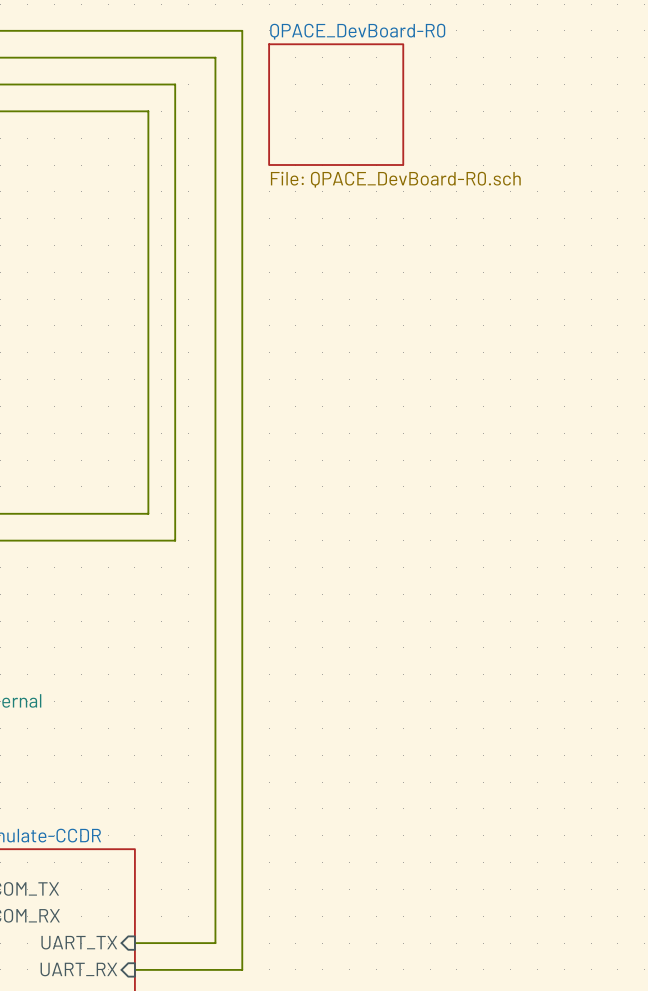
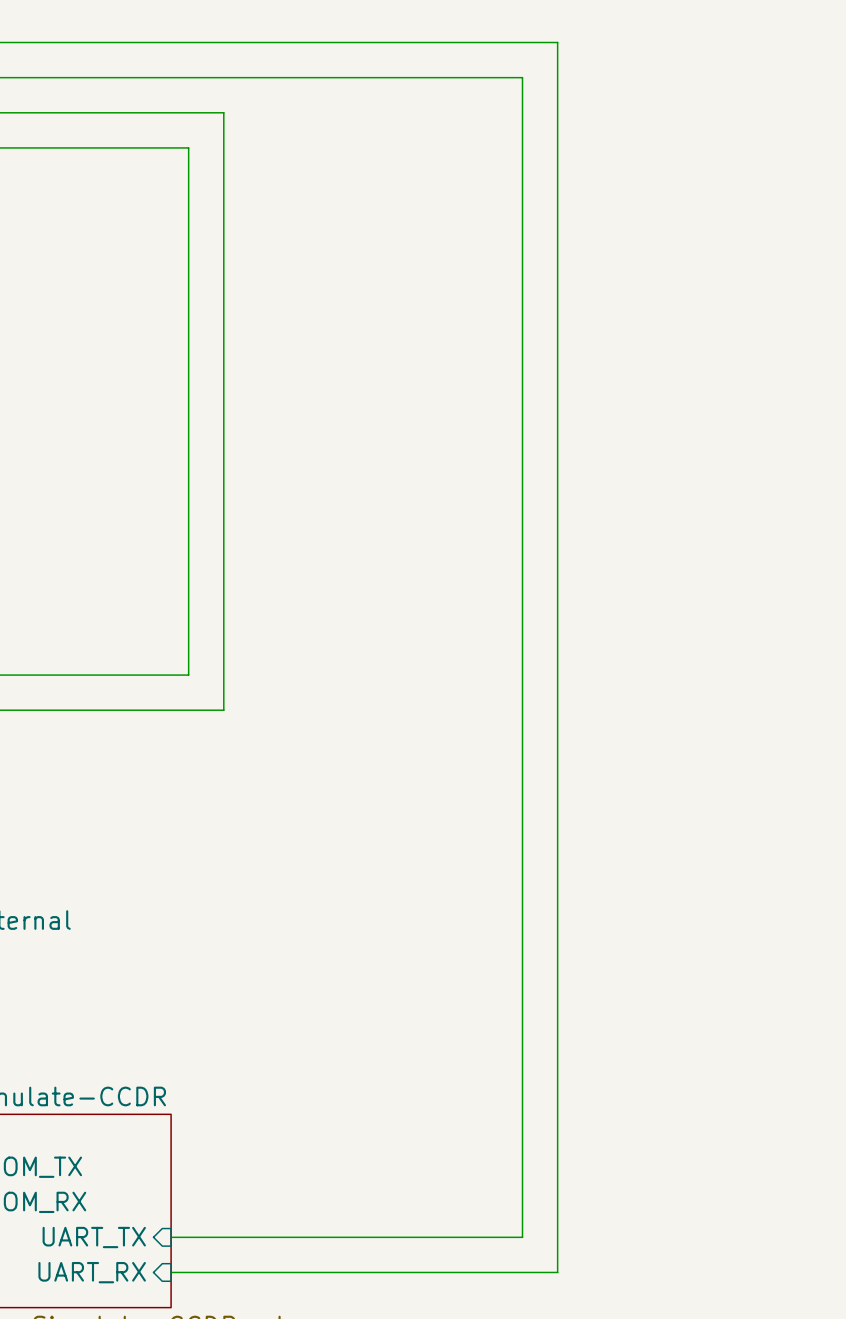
wire: (242, 30) (242, 969) -> (311, 42) (557, 42) (557, 1272) (311, 1272)
wire: (215, 57) (215, 943) -> (276, 77) (522, 77) (522, 1237) (276, 1237)
sheet QPACE_DevBoard-R0: File: QPACE_DevBoard-R0.sch (336, 104) -> none

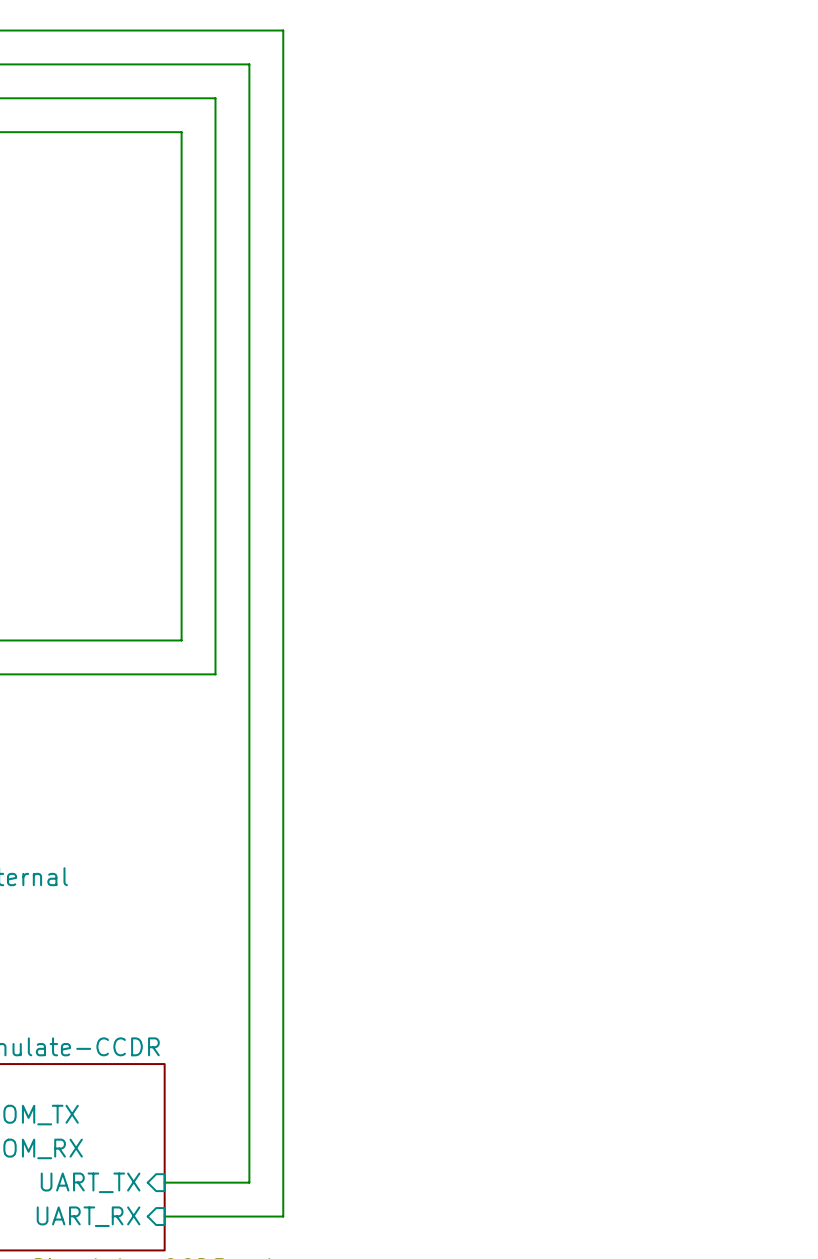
wire: (294, 42) (557, 42) (557, 1272) (294, 1272) -> (283, 30) (283, 1216)
wire: (258, 77) (522, 77) (522, 1237) (258, 1237) -> (249, 64) (249, 1182)

